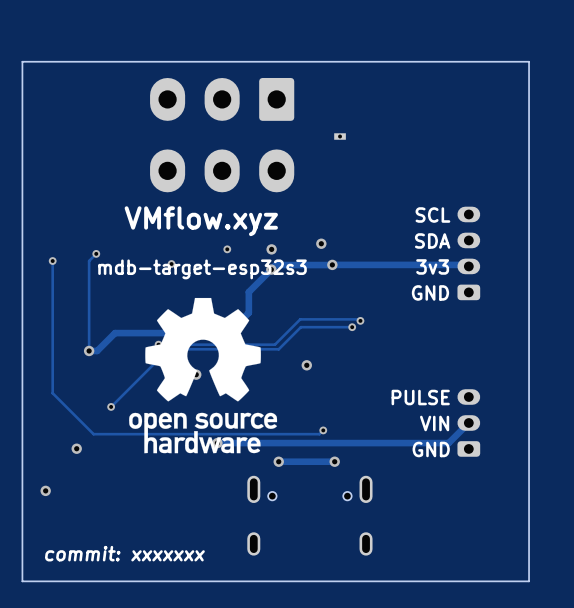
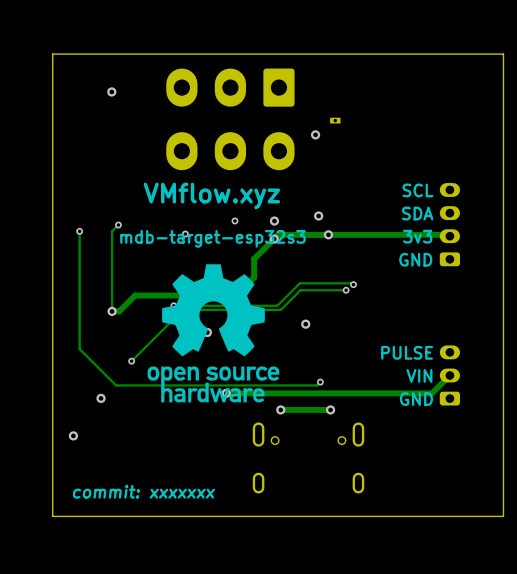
via: none -> (111, 91)
via: none -> (315, 134)

